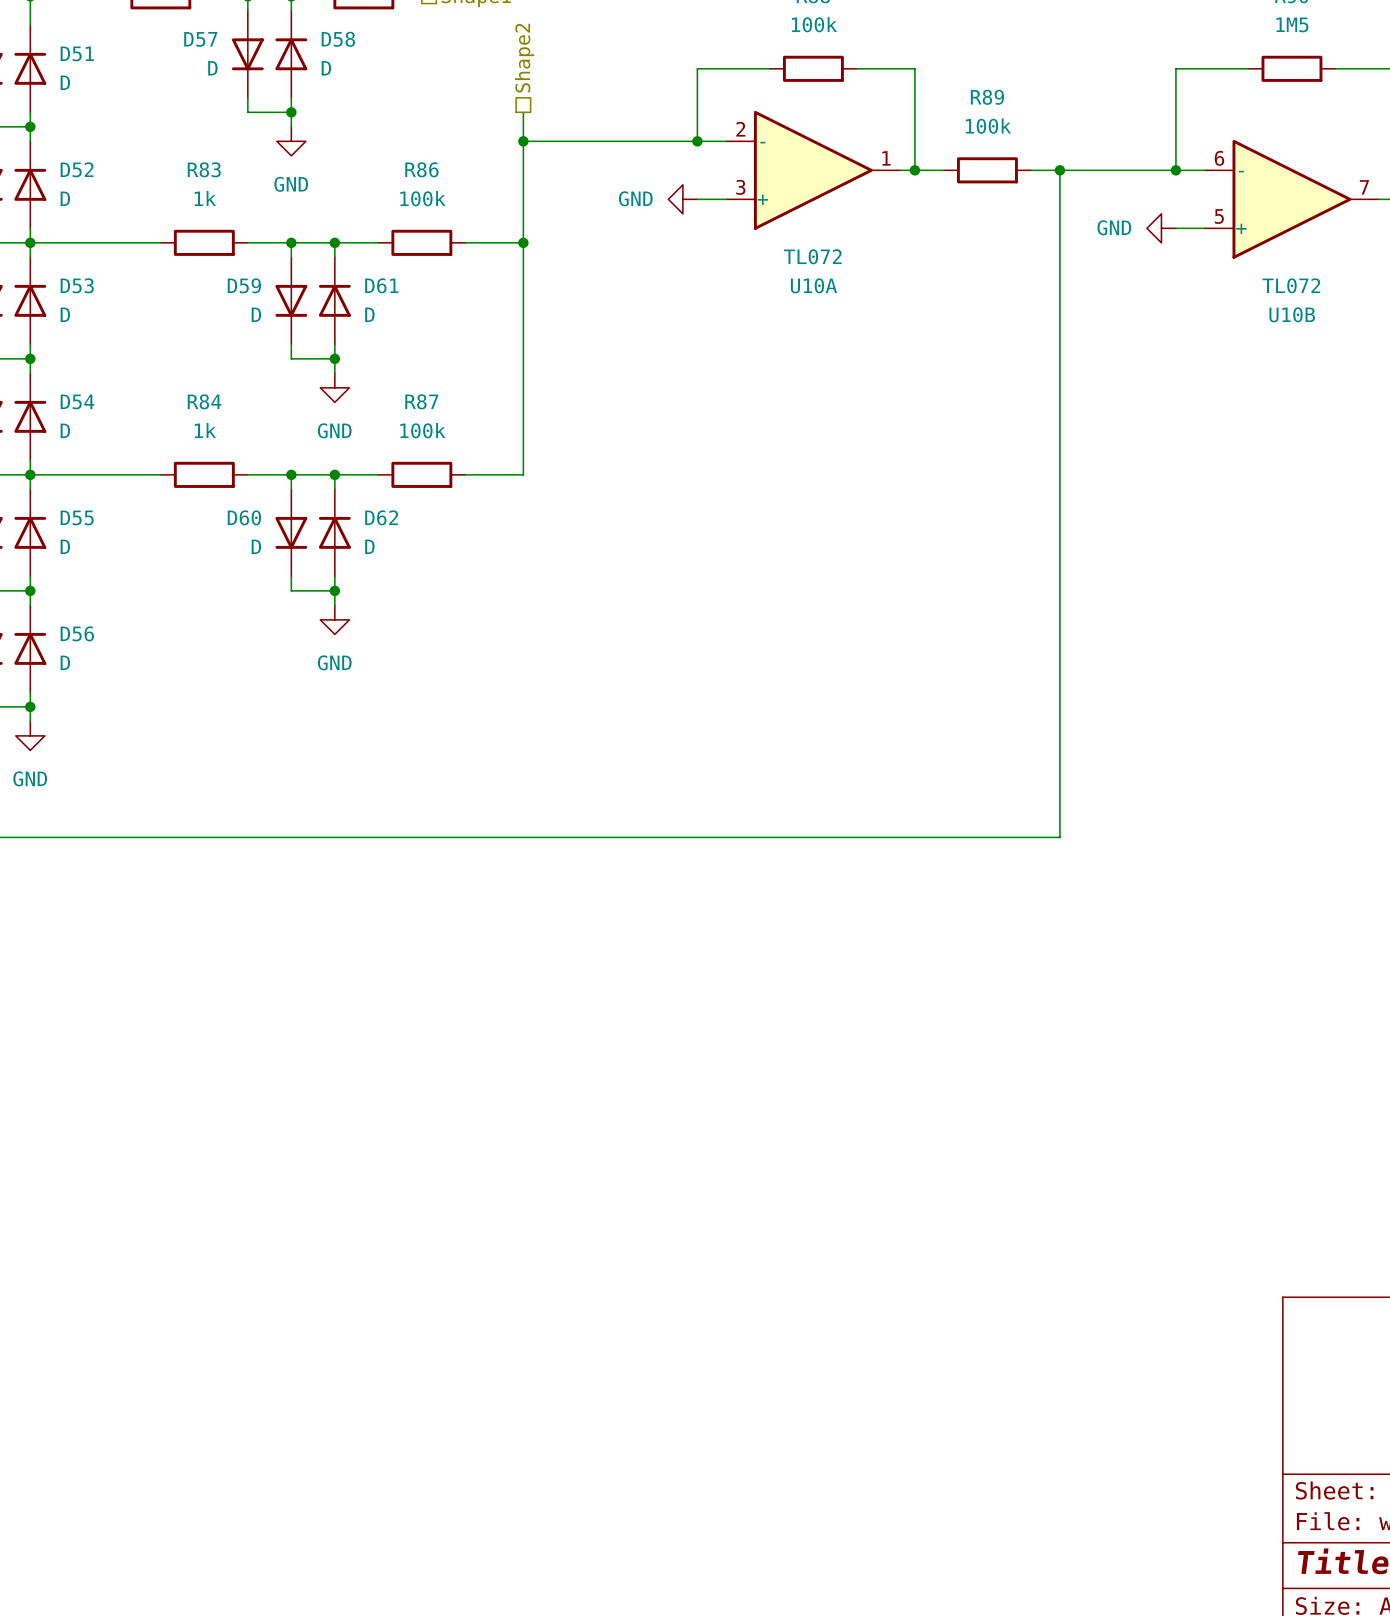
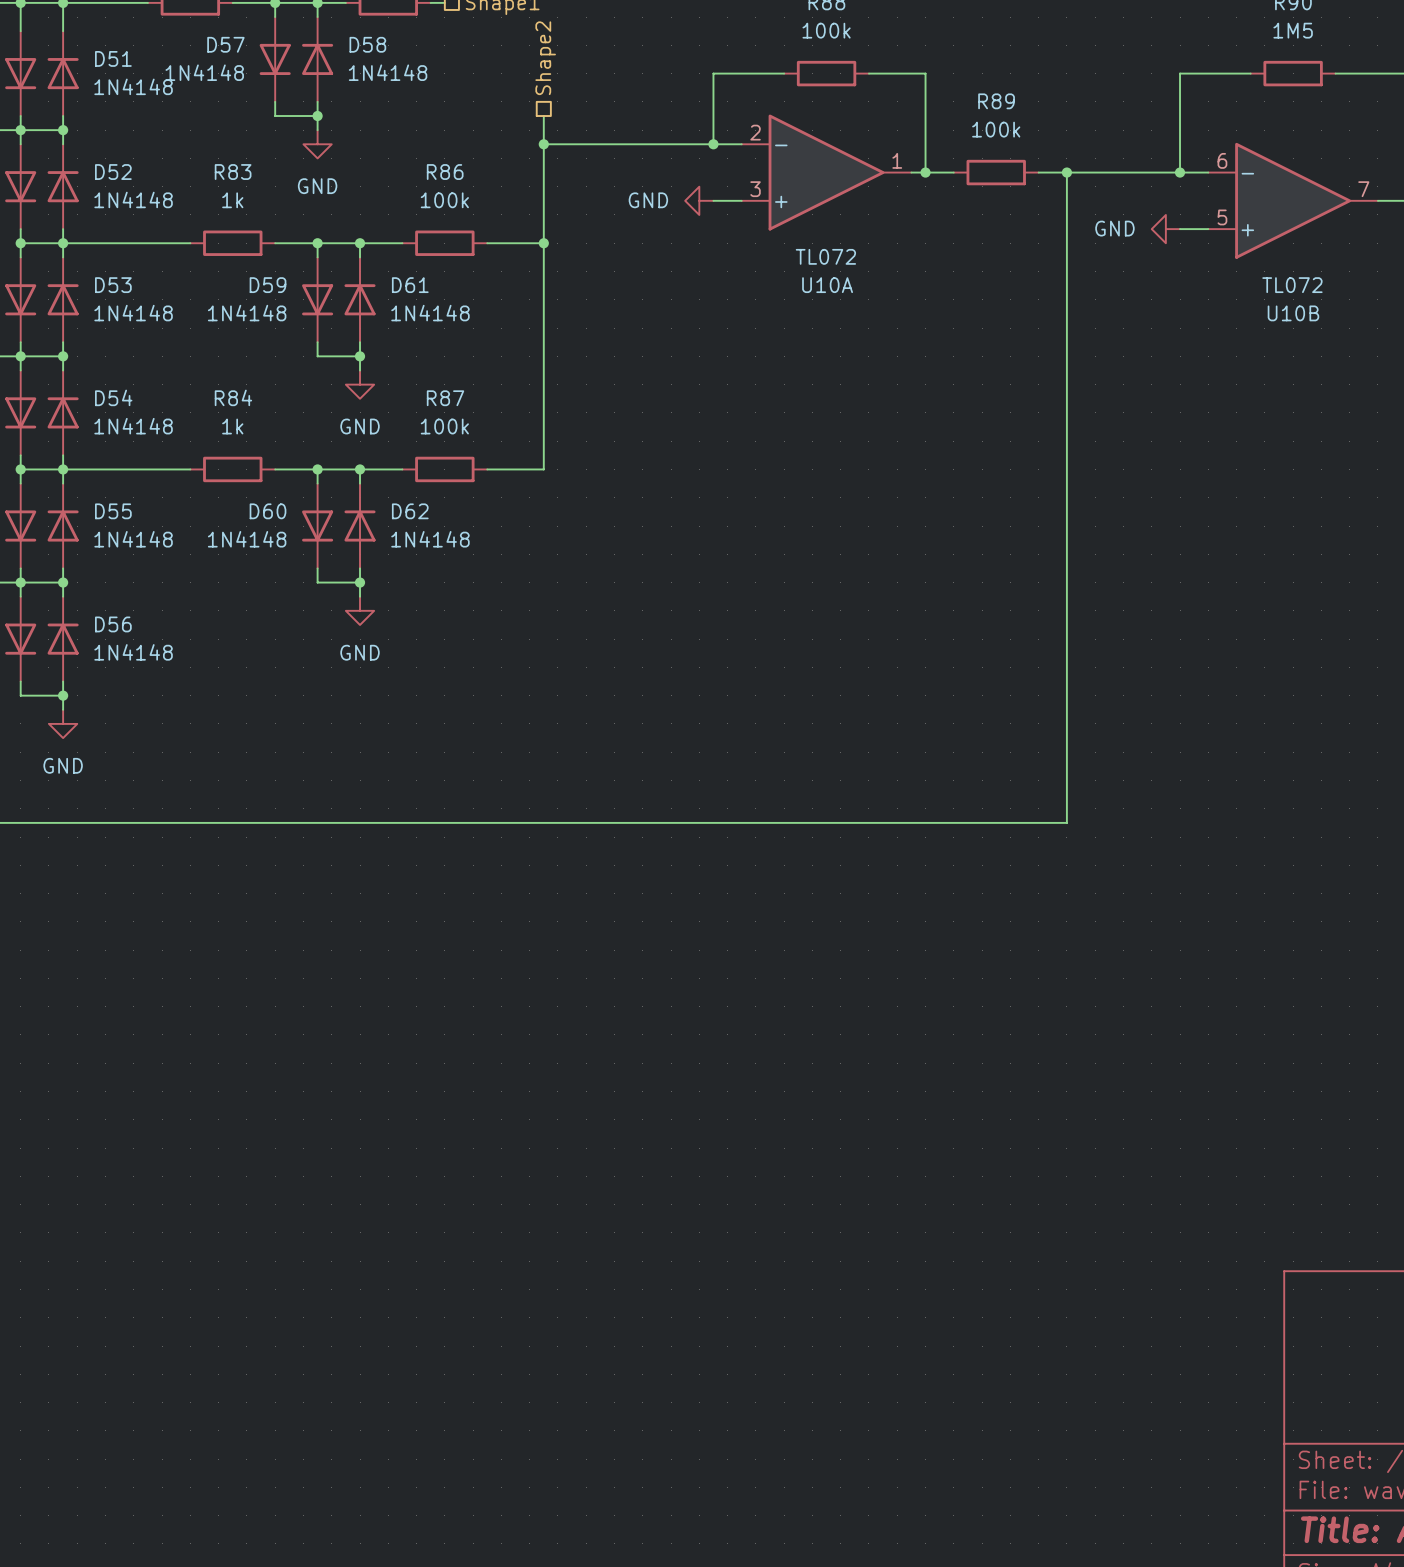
D57 value: D (212, 68) -> 1N4148 (204, 72)
D58 value: D (326, 68) -> 1N4148 (388, 72)
D51 value: D (65, 82) -> 1N4148 (133, 86)
D52 value: D (65, 198) -> 1N4148 (133, 199)
D53 value: D (65, 314) -> 1N4148 (133, 313)
D59 value: D (256, 314) -> 1N4148 (247, 313)
D61 value: D (369, 314) -> 1N4148 (430, 313)
D54 value: D (65, 430) -> 1N4148 (133, 426)
D55 value: D (65, 546) -> 1N4148 (133, 539)
D60 value: D (256, 546) -> 1N4148 (247, 539)
D62 value: D (369, 546) -> 1N4148 (430, 539)
D56 value: D (65, 662) -> 1N4148 (133, 652)

